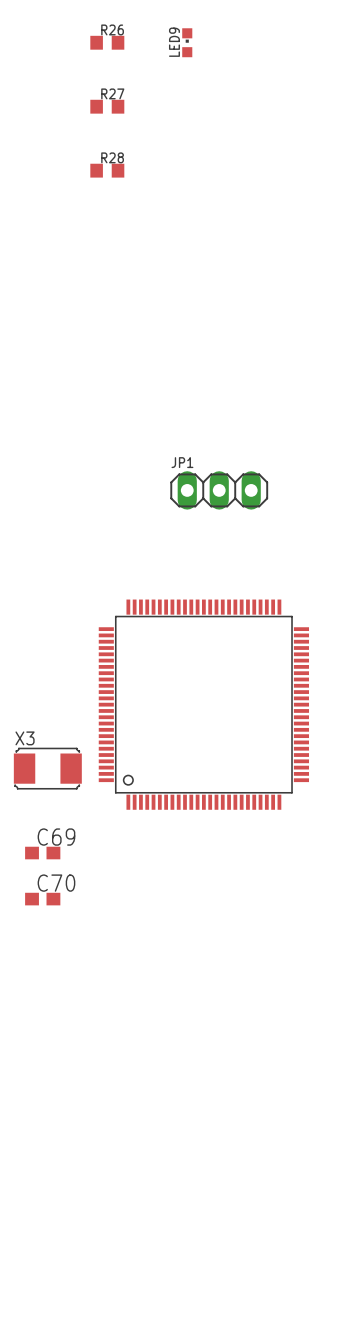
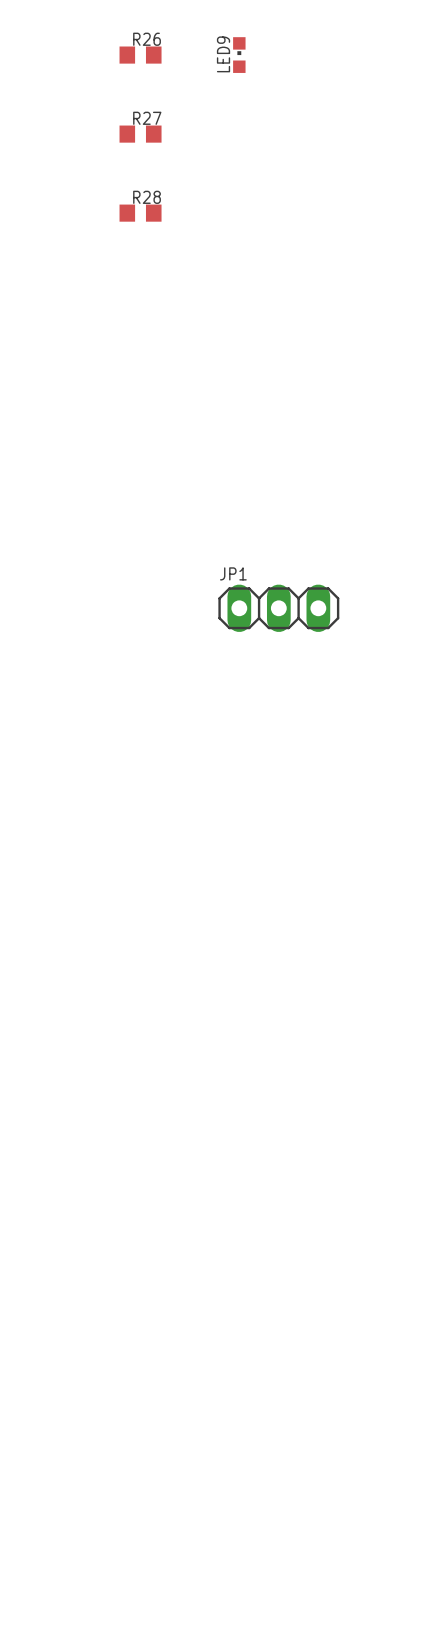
part: (203, 704) -> none
X3: (47, 768) -> none
C69: (42, 853) -> none
C70: (42, 899) -> none

